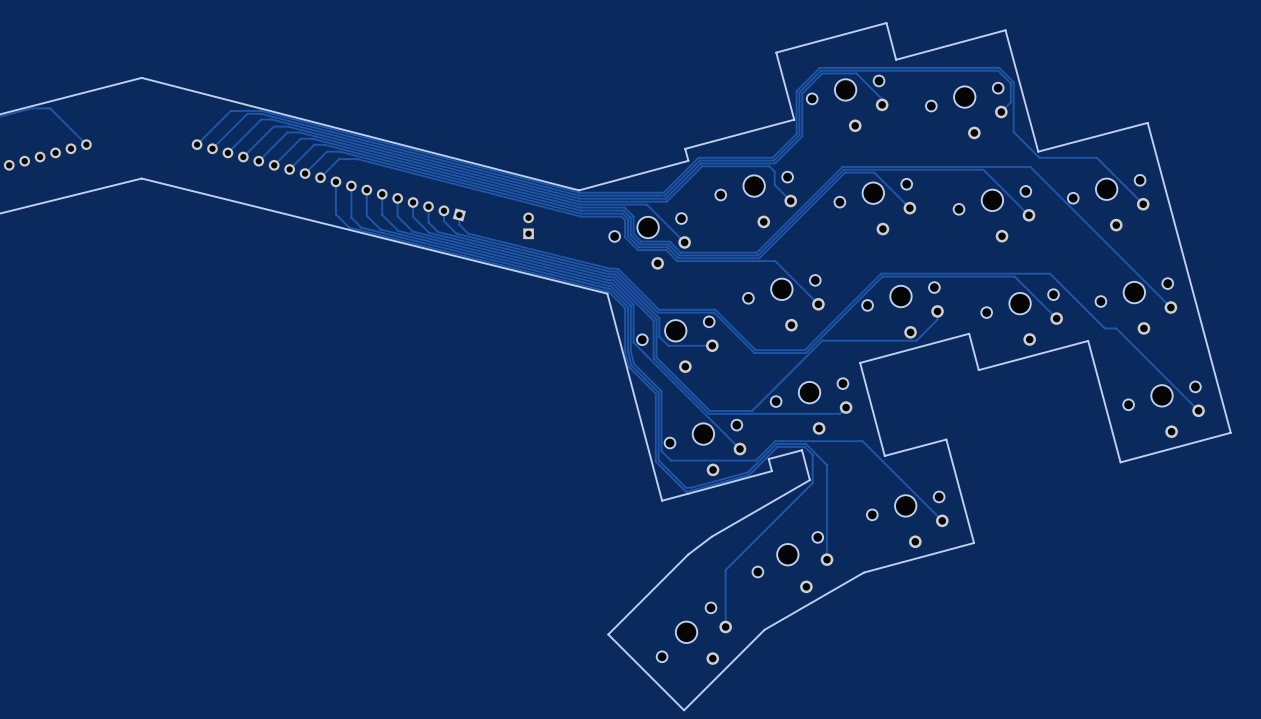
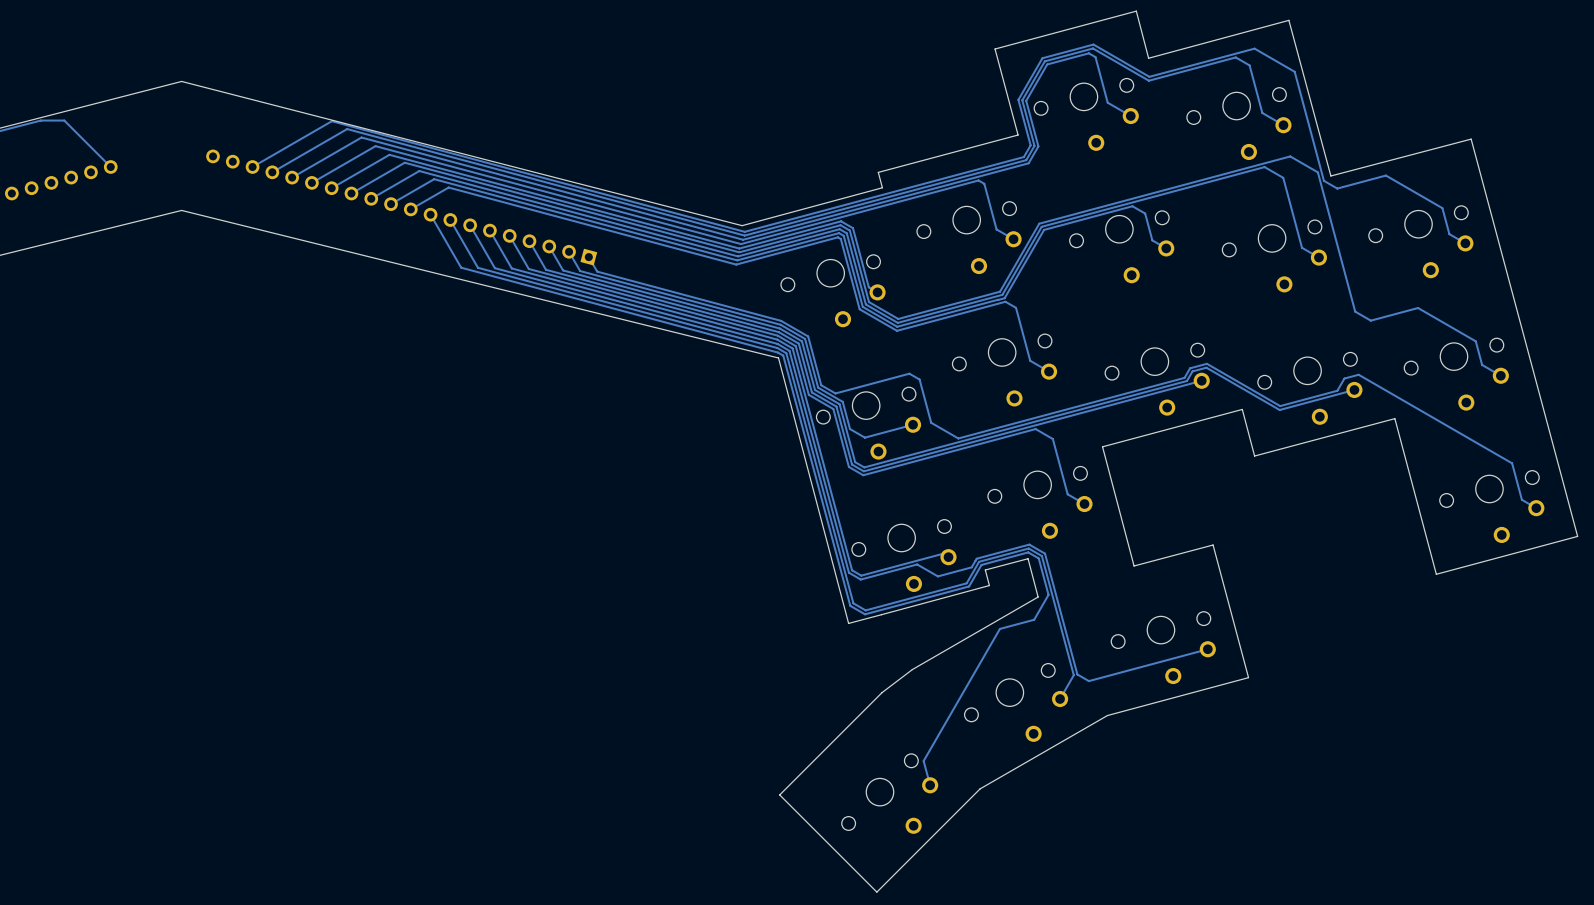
track: (882, 104) (882, 99) (856, 73) (822, 73) (802, 93) (802, 136) (775, 163) (700, 163) (665, 198) (579, 198) (271, 119) (261, 119) (227, 152) -> (1130, 116) (1107, 102) (1095, 57) (1088, 53) (1047, 64) (1026, 100) (1038, 146) (1028, 163) (743, 239) (361, 137) (292, 177)
track: (1001, 112) (1010, 102) (1010, 83) (998, 70) (821, 70) (799, 92) (799, 135) (773, 160) (699, 160) (664, 195) (578, 195) (261, 113) (247, 113) (212, 148) -> (1283, 125) (1262, 112) (1249, 65) (1235, 57) (1148, 80) (1093, 48) (1044, 61) (1022, 100) (1034, 145) (1026, 160) (744, 235) (347, 129) (272, 172)
track: (197, 144) (230, 110) (261, 110) (579, 192) (663, 192) (698, 157) (772, 157) (796, 133) (796, 91) (819, 67) (999, 67) (1013, 82) (1013, 131) (1039, 157) (1096, 157) (1143, 204) -> (252, 167) (331, 121) (744, 231) (1023, 157) (1030, 145) (1018, 99) (1042, 58) (1093, 44) (1149, 76) (1254, 48) (1294, 71) (1323, 180) (1337, 188) (1385, 175) (1442, 208) (1449, 234) (1465, 243)
track: (243, 157) (273, 126) (288, 126) (579, 201) (666, 201) (702, 166) (769, 166) (774, 171) (774, 184) (790, 201) -> (311, 182) (375, 146) (741, 244) (978, 180) (984, 183) (996, 229) (1013, 239)
track: (258, 161) (287, 132) (299, 132) (579, 204) (646, 204) (684, 242) -> (331, 188) (389, 154) (739, 248) (841, 221) (852, 228) (868, 287) (877, 292)
track: (274, 165) (300, 138) (312, 138) (580, 207) (624, 207) (633, 216) (633, 233) (641, 241) (669, 241) (680, 252) (756, 252) (842, 166) (1030, 166) (1170, 307) -> (739, 252) (840, 225) (849, 230) (869, 302) (898, 318) (1000, 291) (1039, 223) (1290, 156) (1317, 172) (1355, 311) (1370, 320) (1418, 308) (1475, 341) (1482, 364) (1500, 375)
track: none -> (351, 193) (404, 162) (738, 252)
track: (289, 169) (314, 144) (324, 144) (580, 210) (623, 210) (630, 217) (630, 234) (640, 244) (668, 244) (679, 255) (758, 255) (843, 169) (983, 169) (1028, 215) -> (371, 198) (419, 171) (738, 256) (839, 229) (846, 233) (865, 304) (897, 322) (1002, 294) (1041, 226) (1264, 167) (1283, 177) (1302, 247) (1318, 257)
track: (305, 173) (326, 151) (340, 151) (580, 213) (622, 213) (627, 218) (627, 236) (639, 247) (667, 247) (678, 258) (759, 258) (845, 172) (874, 172) (909, 208) -> (391, 204) (434, 179) (737, 260) (839, 233) (843, 235) (862, 306) (897, 326) (1004, 298) (1044, 229) (1132, 206) (1145, 213) (1152, 240) (1166, 248)
part: none -> (401, 207)
track: (320, 177) (339, 159) (357, 159) (581, 216) (621, 216) (625, 220) (625, 237) (637, 250) (666, 250) (677, 261) (775, 261) (818, 304) -> (410, 209) (448, 187) (736, 264) (837, 237) (840, 238) (859, 309) (897, 330) (1005, 301) (1016, 307) (1030, 360) (1049, 371)
part: (328, 180) -> none
track: (335, 181) (335, 214) (349, 227) (608, 291) (625, 308) (625, 352) (628, 366) (655, 393) (655, 461) (686, 491) (749, 474) (777, 446) (804, 446) (812, 454) (812, 483) (725, 570) (725, 626) -> (430, 214) (461, 267) (777, 352) (783, 355) (850, 605) (865, 614) (969, 586) (981, 564) (1028, 552) (1038, 558) (1048, 594) (1034, 619) (999, 628) (923, 761) (930, 785)
track: (351, 185) (351, 217) (361, 227) (609, 288) (627, 306) (627, 351) (631, 365) (658, 392) (658, 460) (685, 487) (691, 487) (747, 472) (776, 444) (805, 444) (827, 465) (827, 559) -> (450, 220) (477, 267) (777, 348) (786, 353) (853, 603) (865, 610) (966, 583) (979, 561) (1028, 548) (1041, 556) (1073, 675) (1060, 699)
track: (366, 190) (366, 215) (380, 229) (610, 285) (630, 305) (630, 351) (634, 363) (661, 391) (661, 451) (670, 460) (755, 460) (775, 441) (862, 441) (942, 520) -> (470, 225) (494, 268) (777, 343) (789, 350) (848, 572) (860, 579) (917, 564) (937, 576) (971, 567) (976, 558) (1029, 544) (1045, 553) (1077, 674) (1088, 681) (1207, 649)
track: (382, 194) (382, 214) (398, 230) (612, 282) (633, 304) (633, 342) (739, 449) -> (489, 230) (511, 268) (777, 339) (792, 348) (852, 570) (861, 575) (942, 553) (948, 557)
track: (397, 198) (397, 216) (412, 231) (613, 280) (653, 320) (653, 358) (708, 413) (839, 413) (846, 407) -> (509, 235) (528, 268) (777, 335) (795, 346) (808, 394) (833, 409) (848, 466) (863, 475) (1035, 429) (1052, 439) (1067, 494) (1084, 504)
track: (413, 202) (413, 216) (429, 232) (614, 277) (656, 319) (656, 357) (710, 411) (752, 411) (822, 340) (916, 340) (937, 319) (937, 311) -> (529, 241) (545, 269) (779, 332) (798, 343) (811, 392) (836, 406) (852, 464) (863, 471) (1201, 380)
track: (428, 206) (428, 222) (438, 232) (615, 274) (659, 318) (659, 336) (668, 345) (712, 345) -> (569, 251) (580, 271) (780, 324) (805, 338) (818, 387) (842, 401) (850, 429) (864, 437) (913, 424)
track: (443, 210) (443, 221) (456, 233) (609, 271) (616, 271) (657, 312) (714, 312) (754, 353) (805, 353) (882, 276) (1014, 276) (1056, 318) -> (549, 246) (563, 270) (779, 328) (801, 341) (815, 390) (839, 404) (855, 462) (864, 467) (1186, 381) (1192, 371) (1206, 367) (1279, 409) (1354, 389)
track: (459, 214) (459, 224) (468, 233) (610, 268) (617, 268) (658, 309) (715, 309) (755, 350) (804, 350) (881, 273) (1050, 273) (1104, 328) (1116, 328) (1198, 410) -> (588, 257) (597, 271) (781, 320) (808, 336) (821, 385) (835, 393) (909, 373) (919, 379) (931, 422) (958, 438) (1184, 377) (1190, 368) (1206, 363) (1280, 406) (1337, 390) (1344, 378) (1358, 374) (1512, 463) (1521, 499) (1536, 508)
part: (528, 225) -> none

